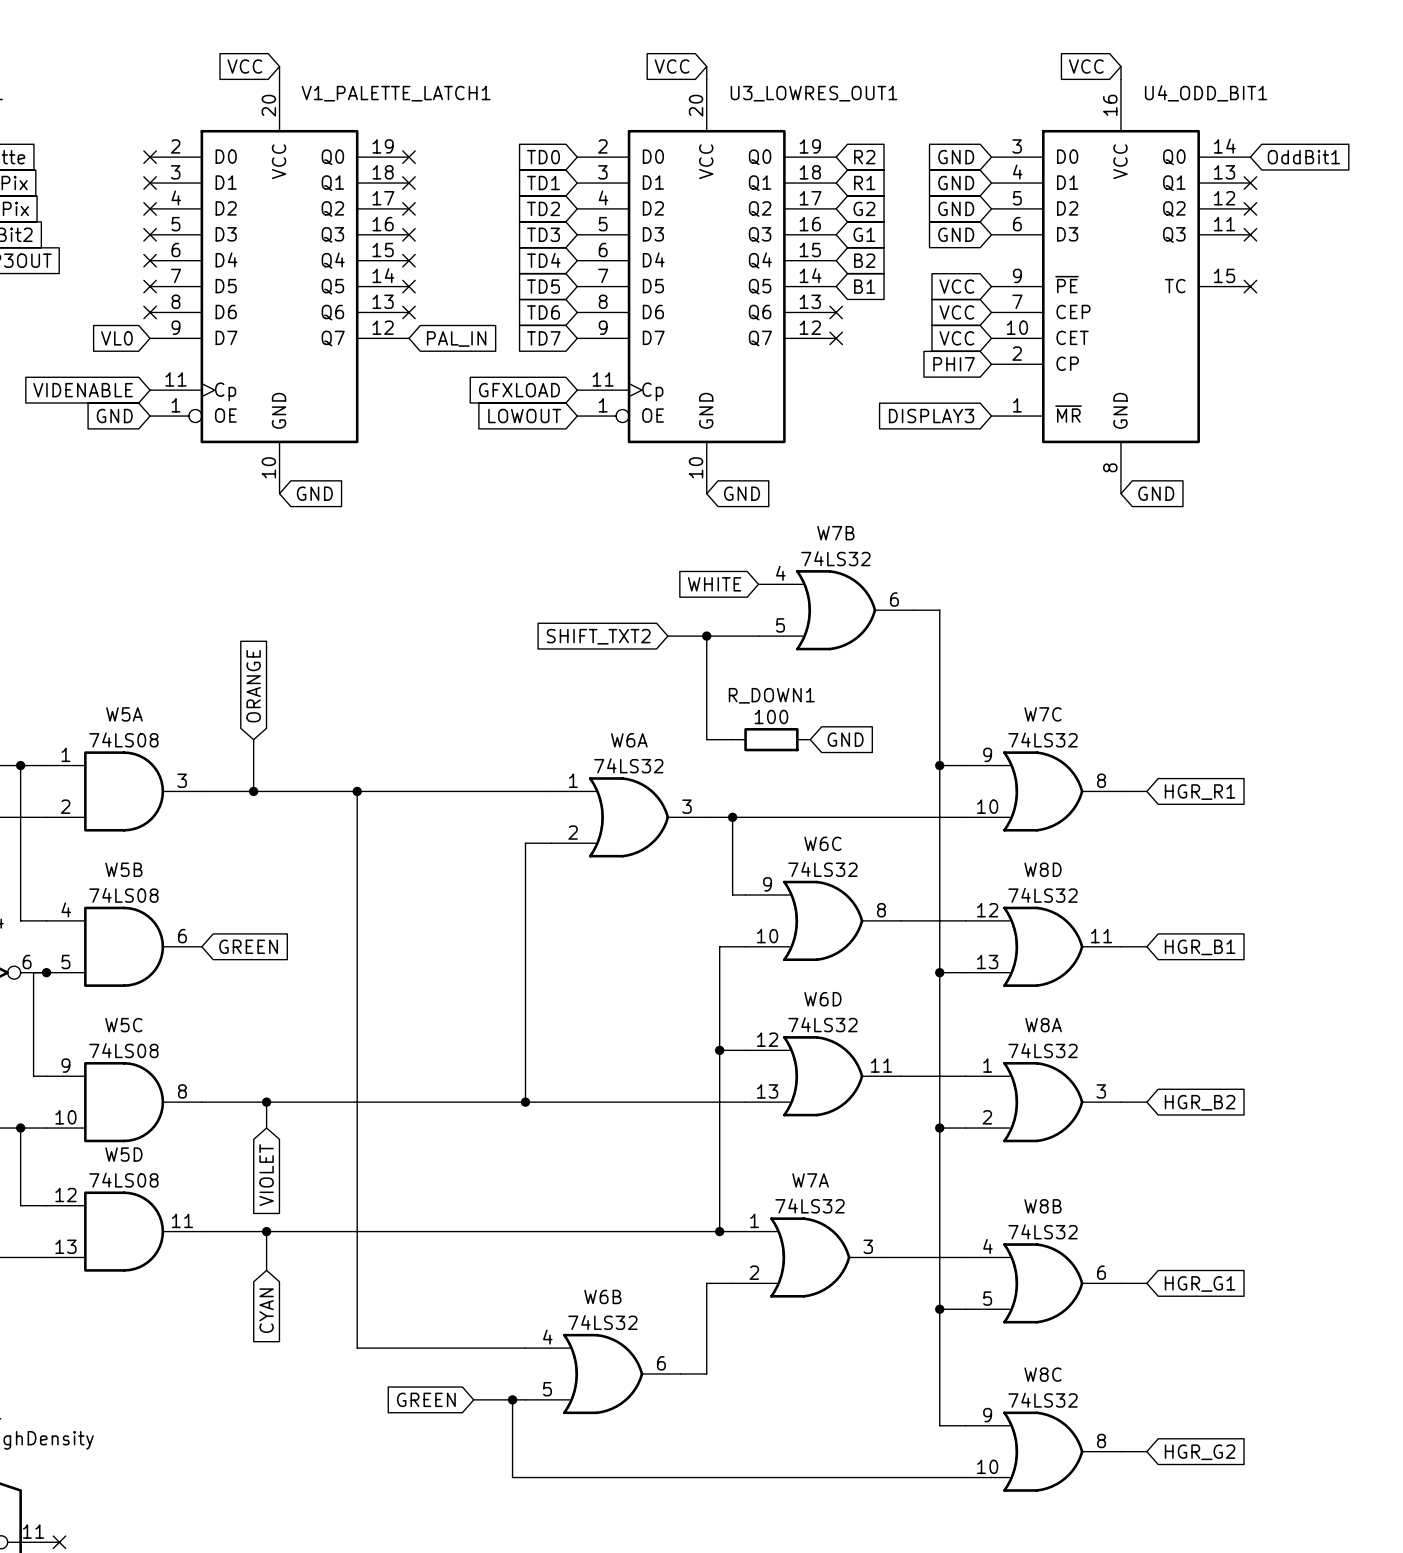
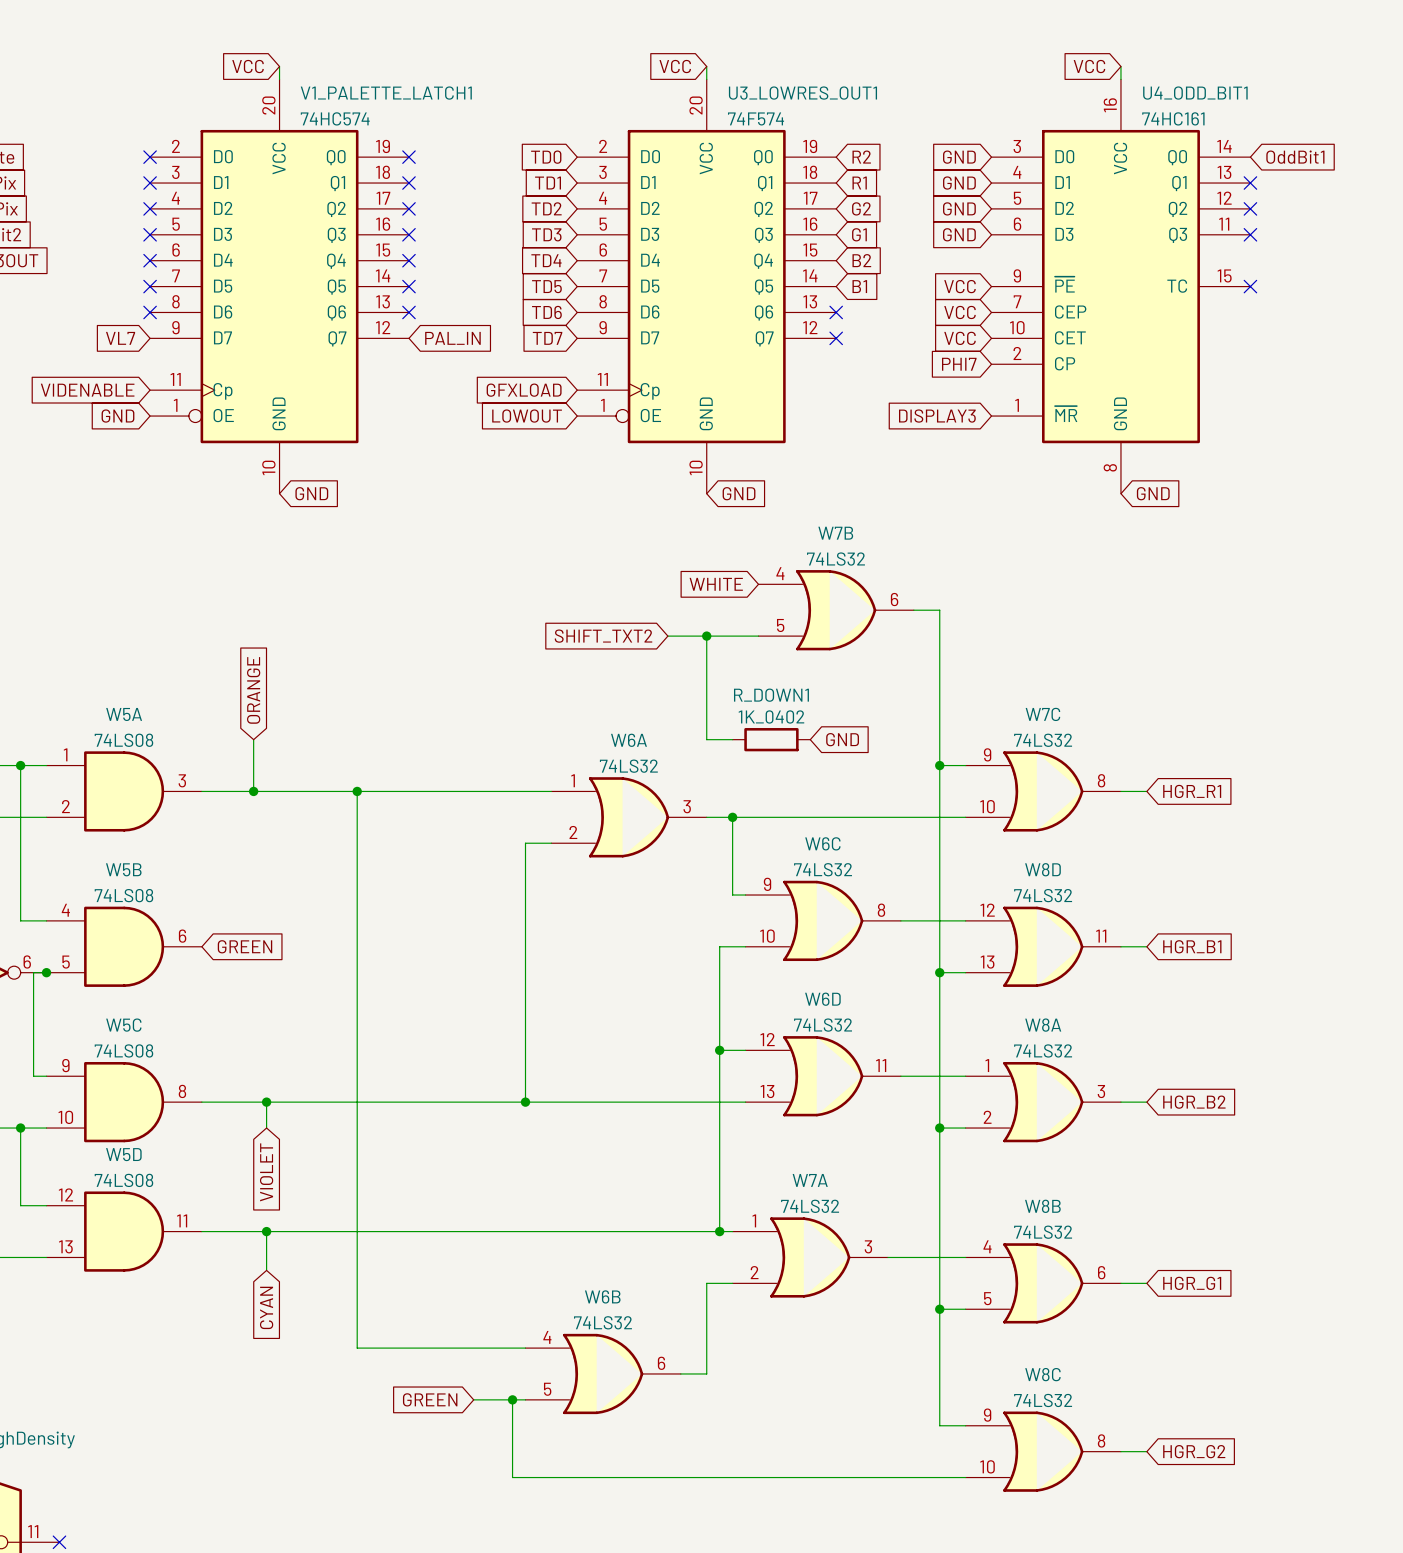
V1_PALETTE_LATCH1 value: none -> 74HC574 (335, 118)
U3_LOWRES_OUT1 value: none -> 74F574 (756, 118)
U4_ODD_BIT1 value: none -> 74HC161 (1173, 118)
global label: VL0 (116, 338) -> VL7 (120, 338)
R_DOWN1 value: 100 (771, 716) -> 1K_0402 (771, 716)

